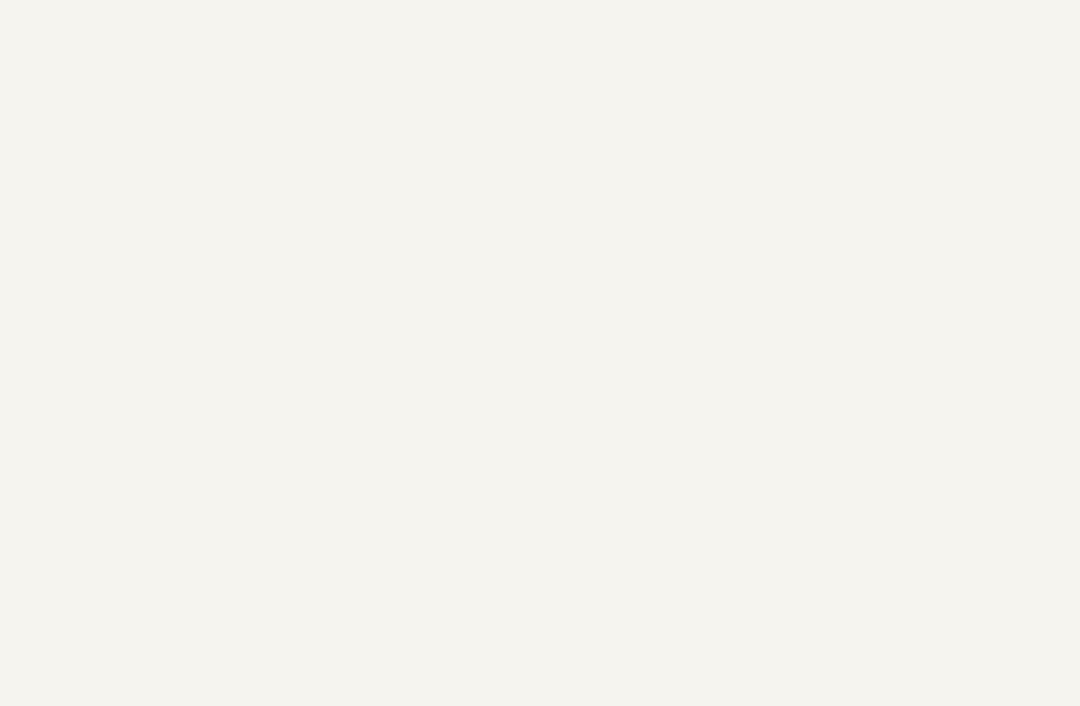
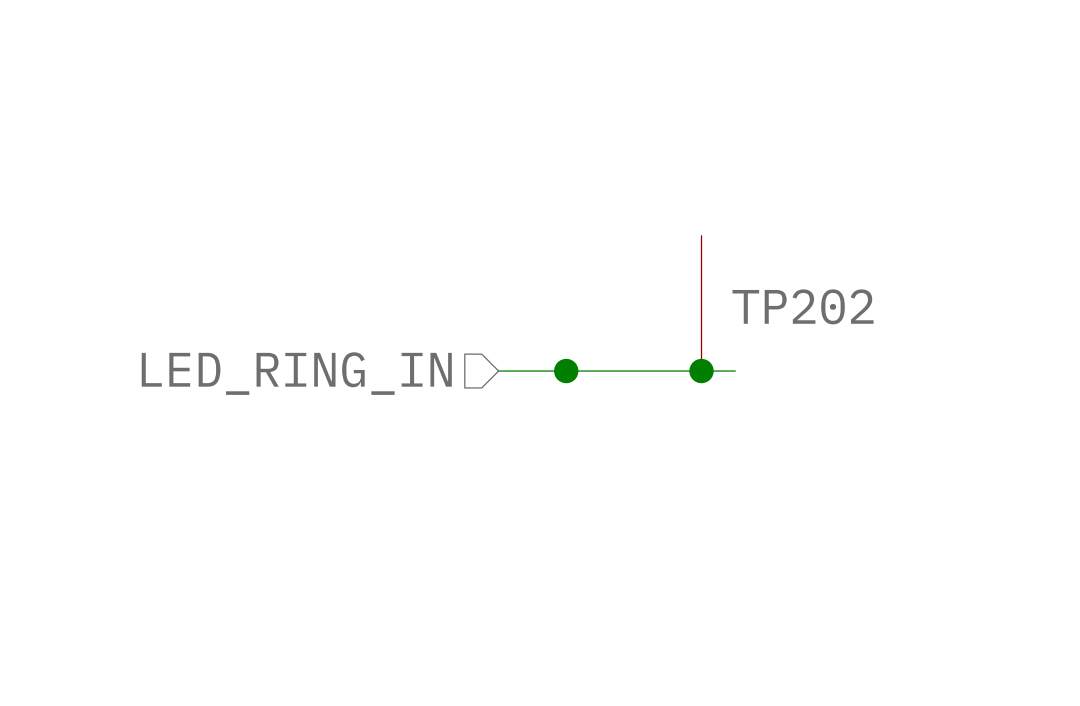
TP202: none -> (701, 303)
wire: none -> (498, 371) (735, 371)
junction: none -> (566, 371)
junction: none -> (701, 371)
hierarchical label: none -> LED_RING_IN (296, 373)

